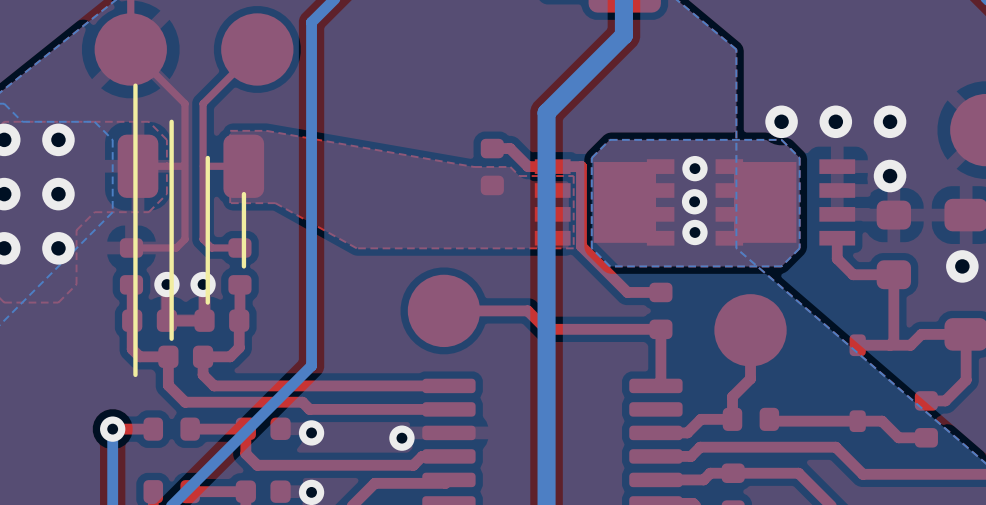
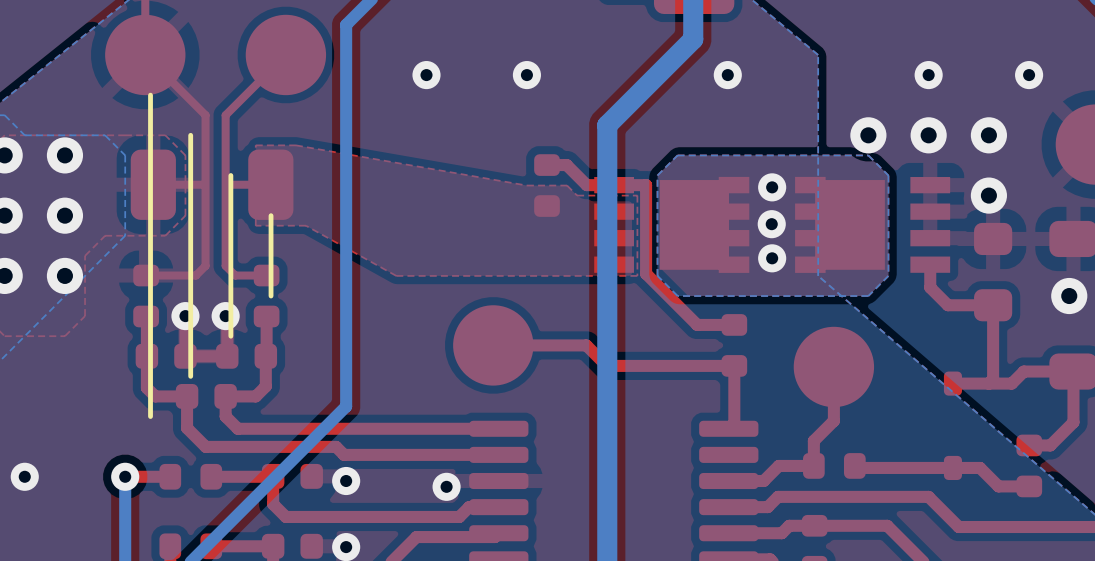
via: none -> (426, 75)
via: none -> (526, 75)
via: none -> (727, 75)
via: none -> (928, 75)
via: none -> (1029, 75)
via: none -> (24, 476)

